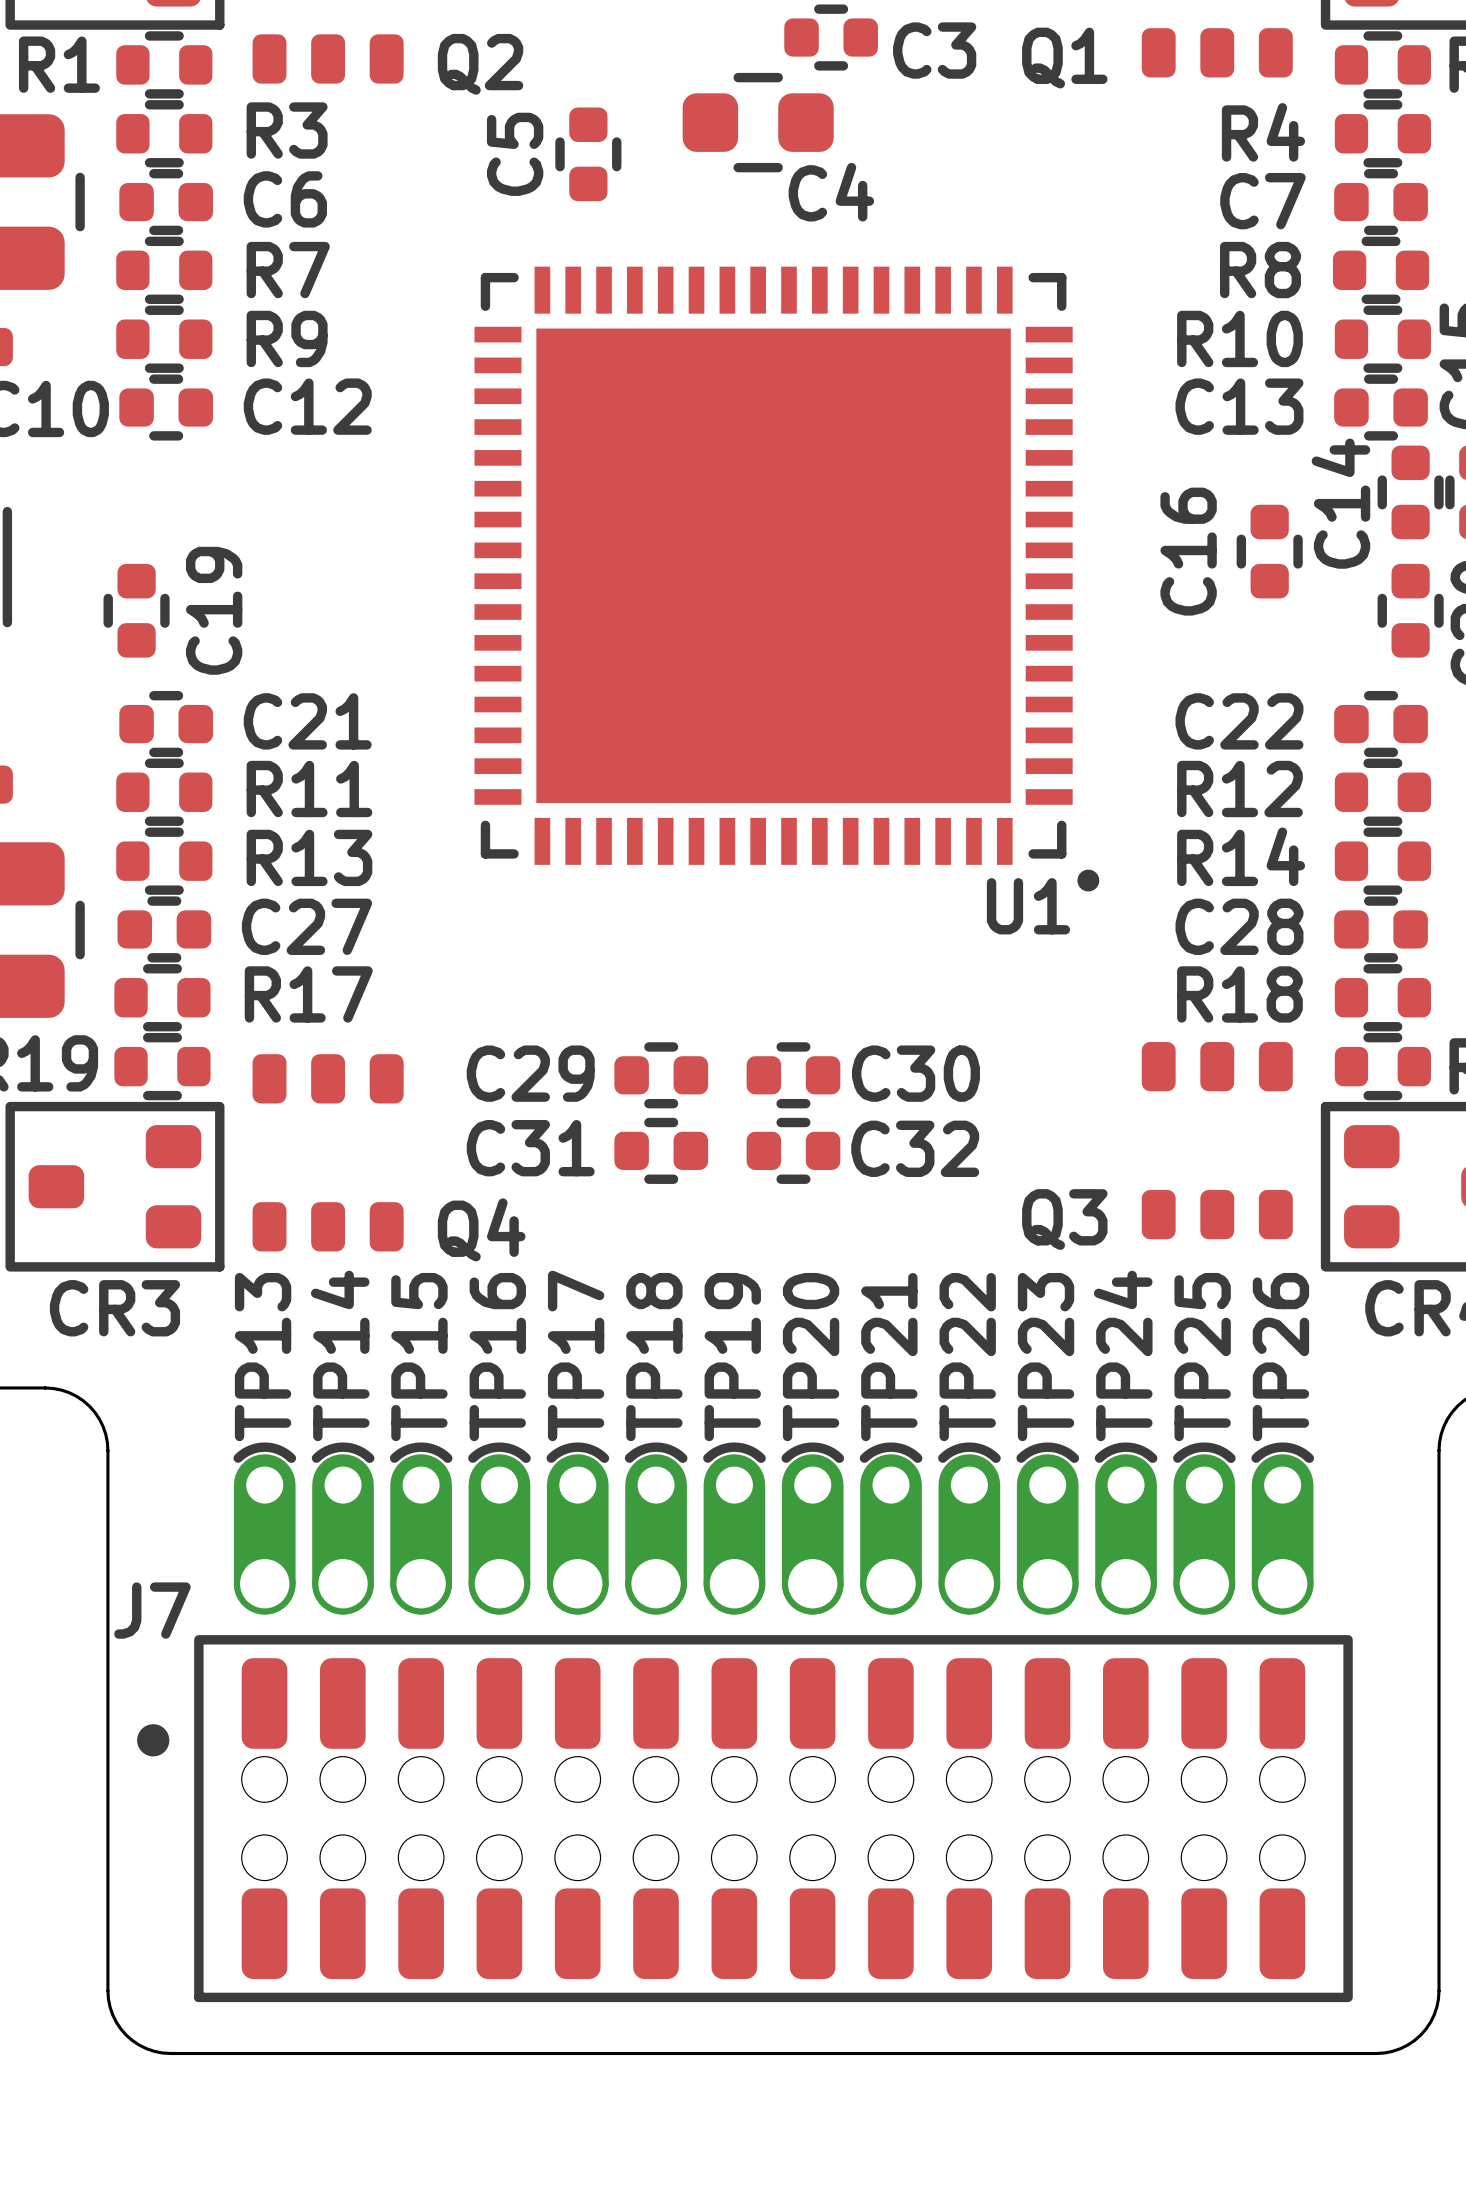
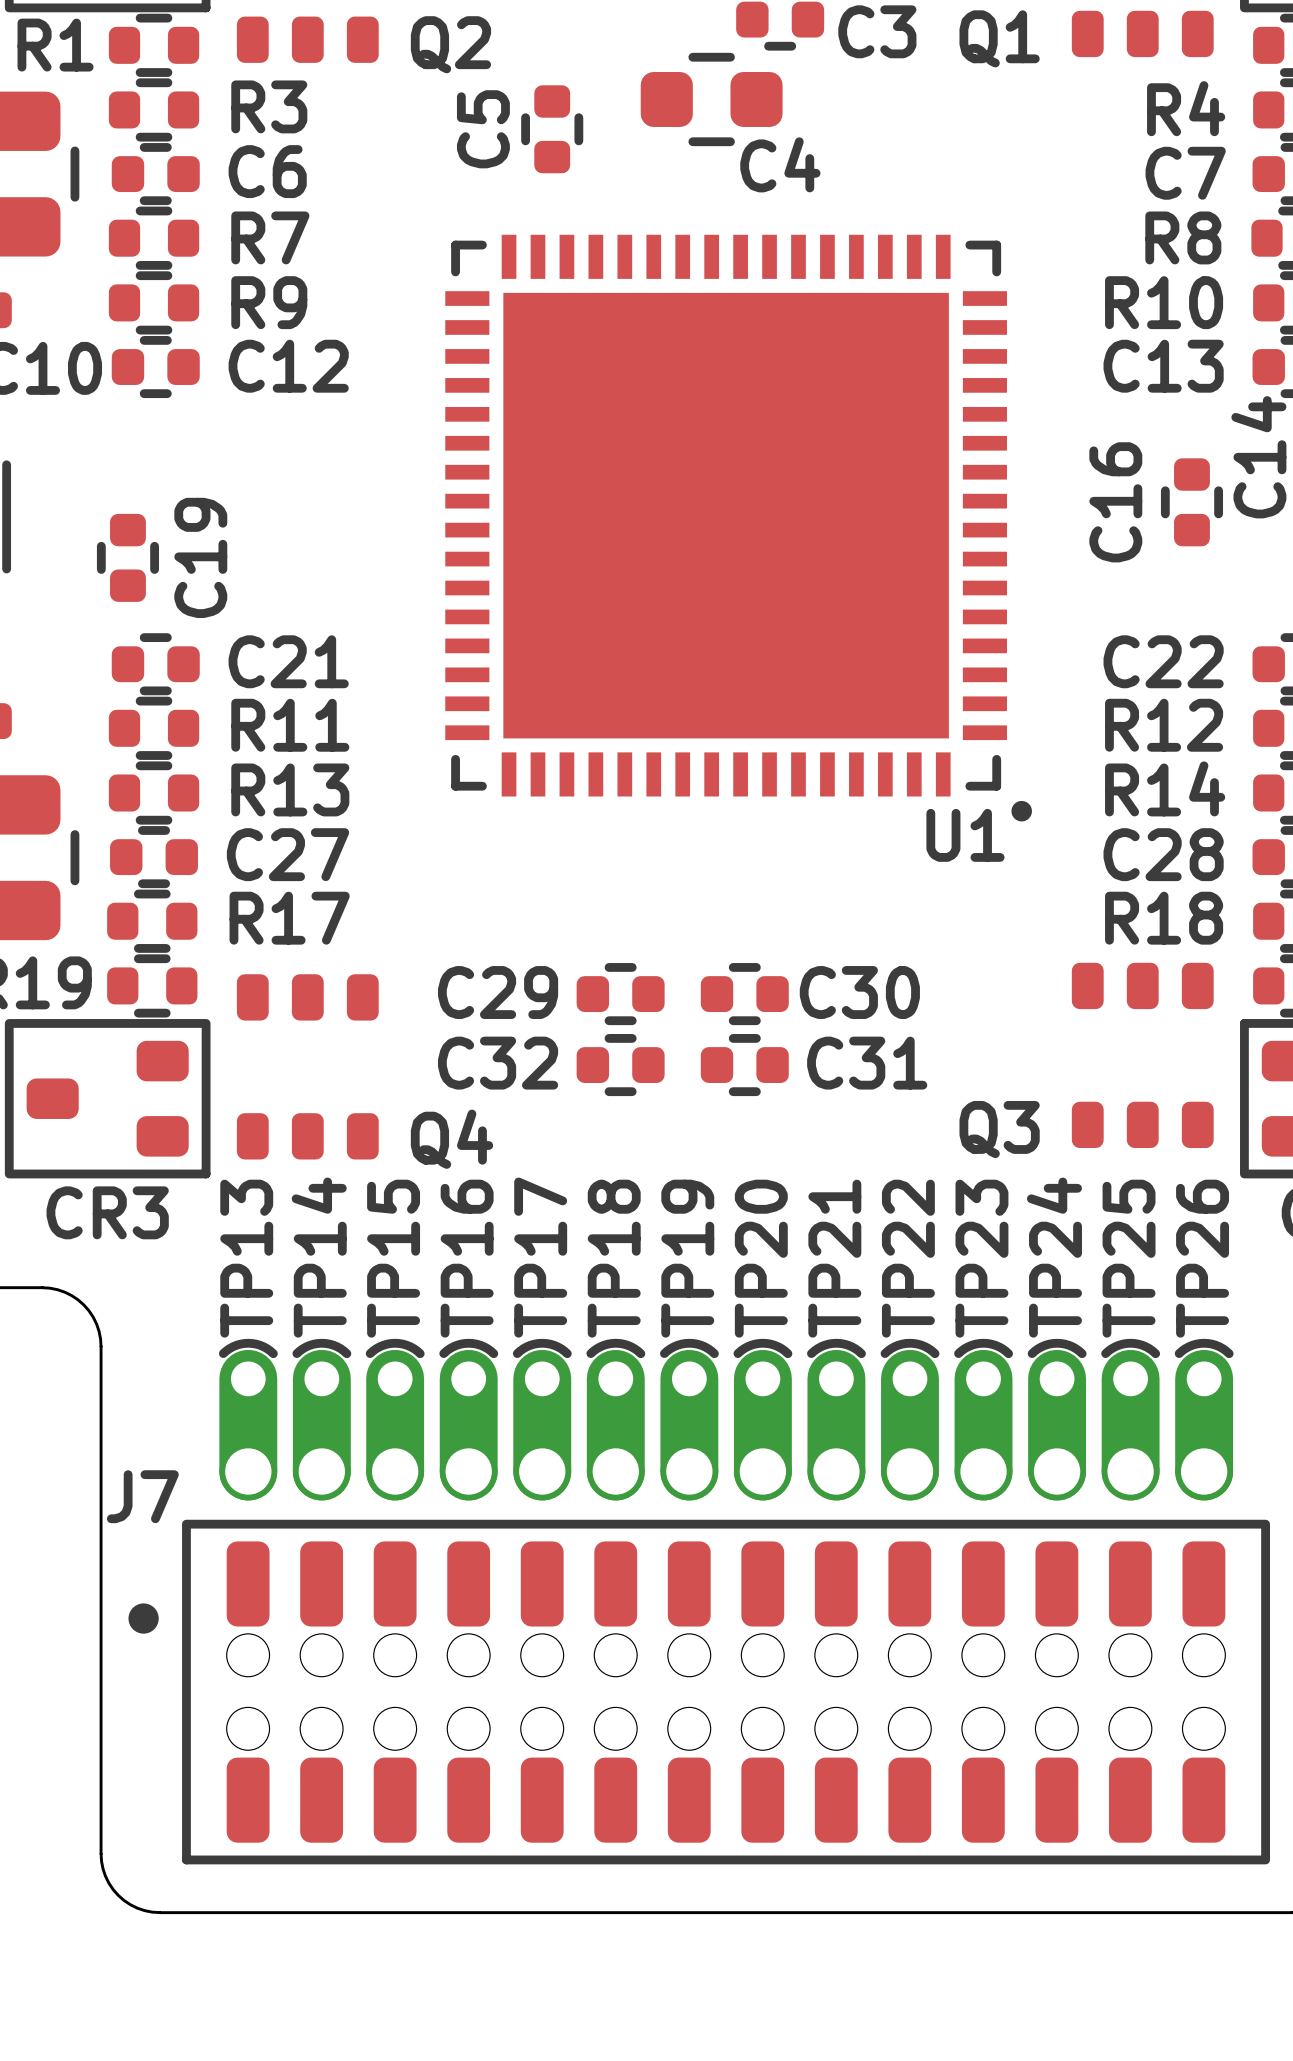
C31 name position: C31 (530, 1148) -> C31 (867, 1063)
C32 name position: C32 (915, 1148) -> C32 (498, 1063)

